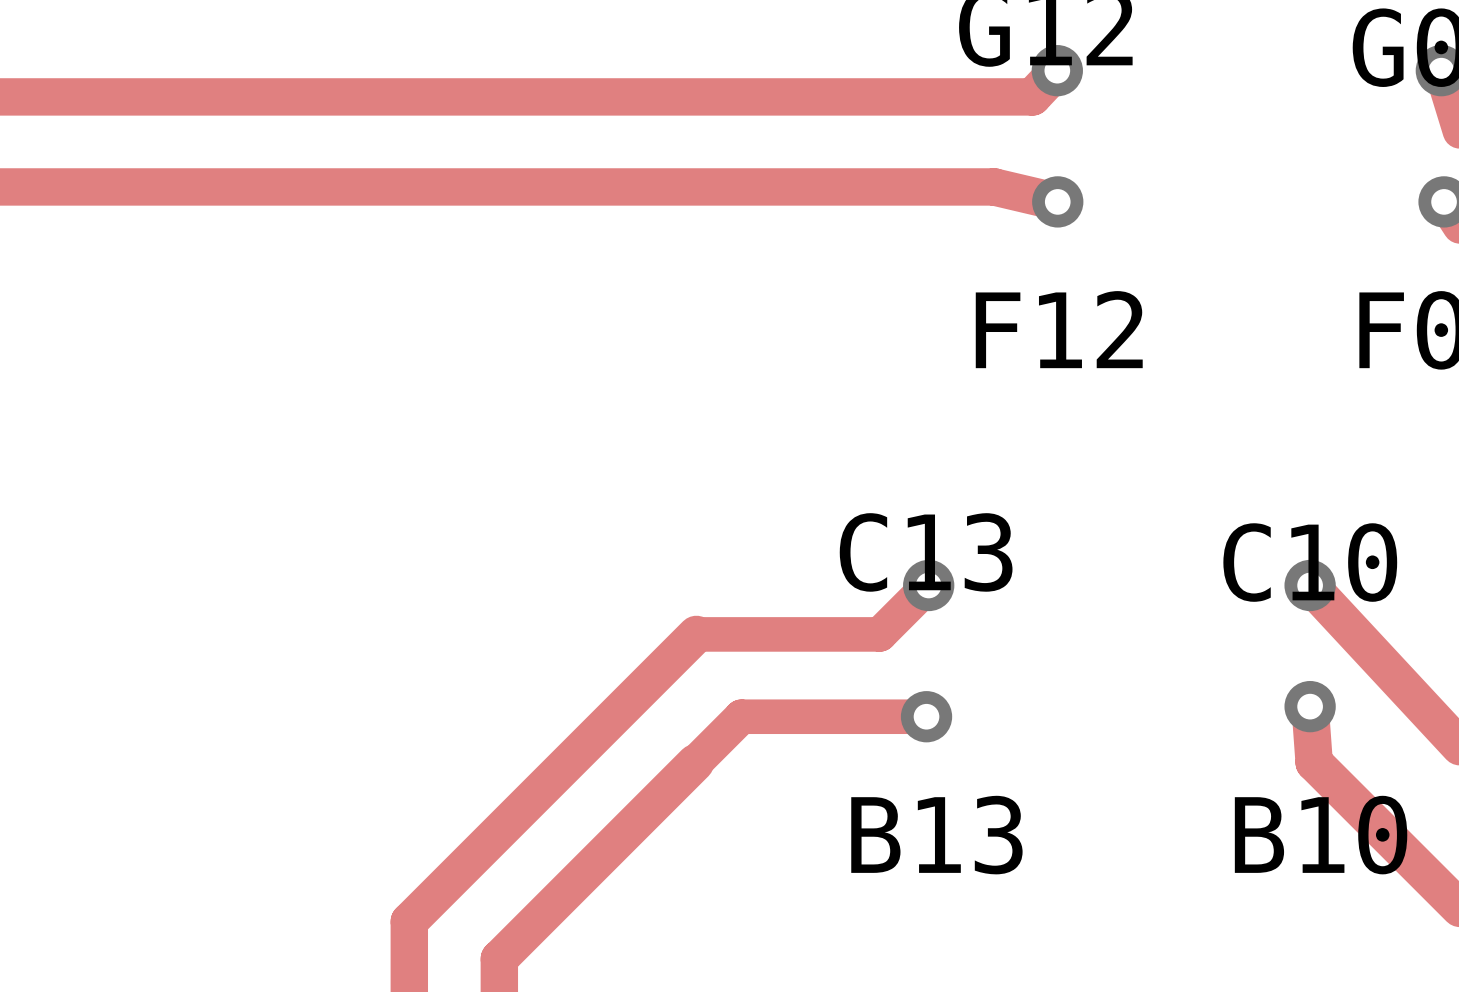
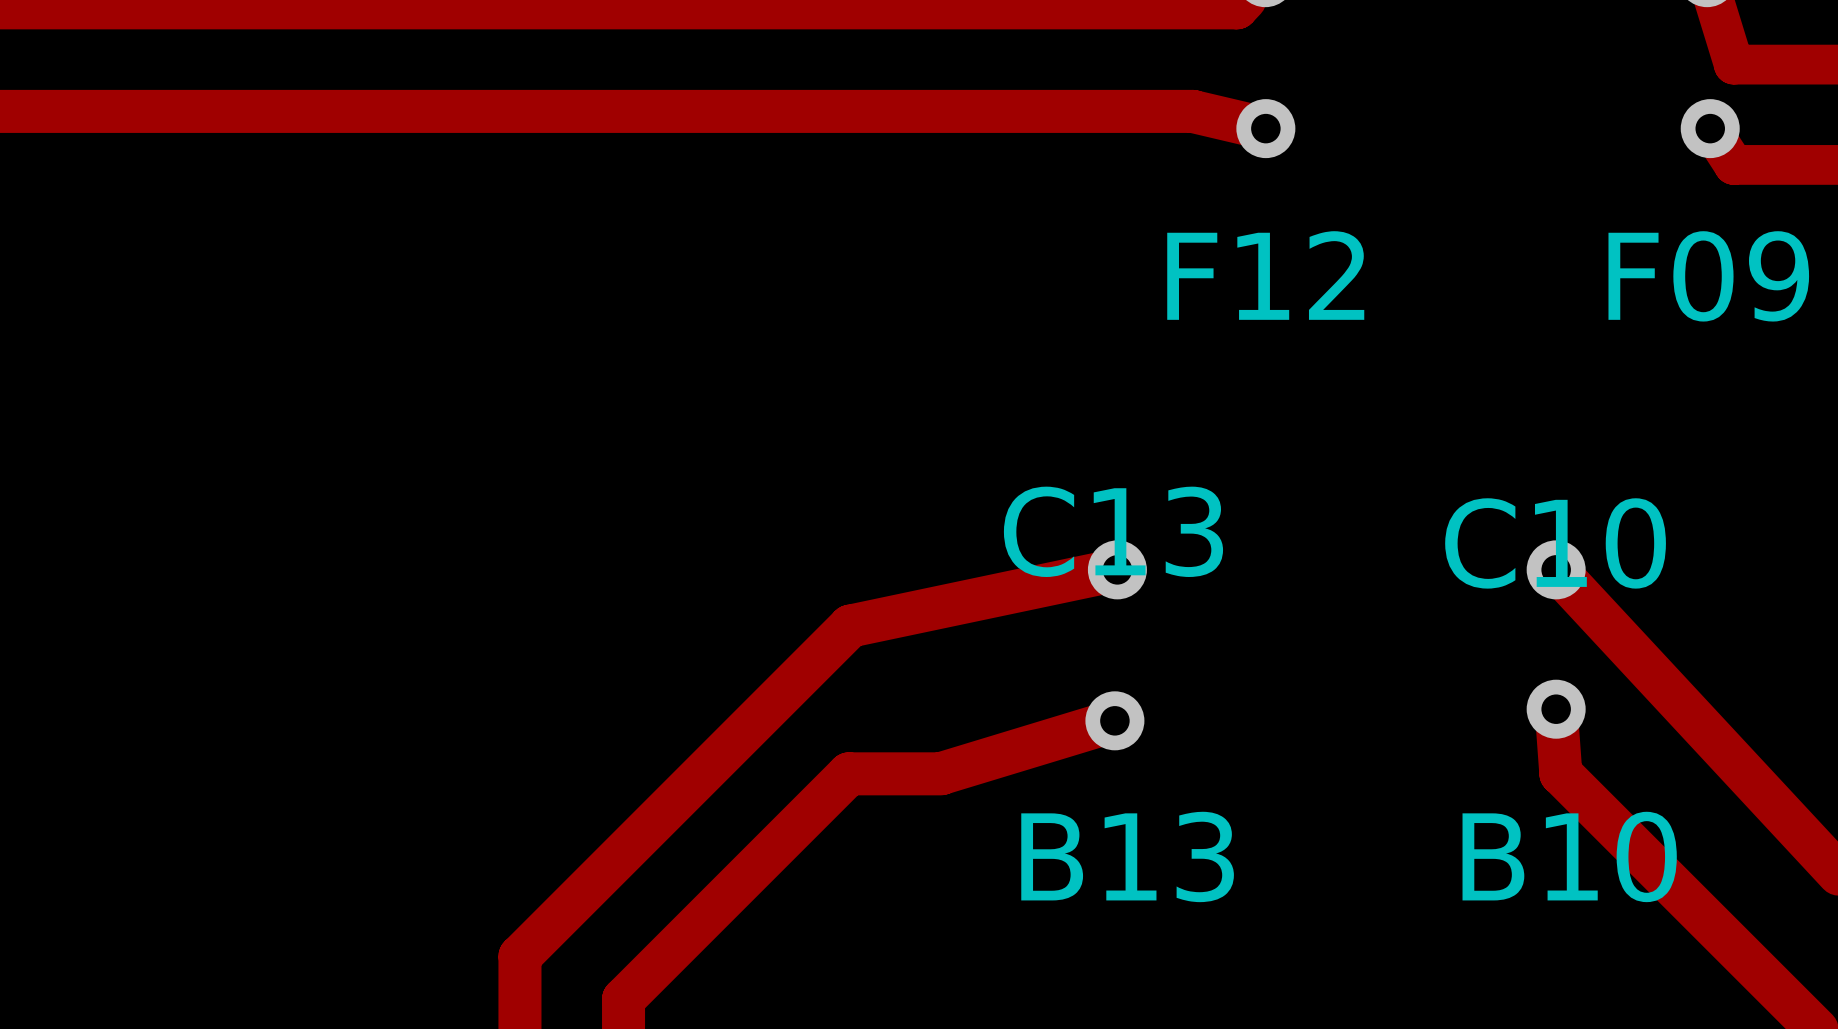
track: (928, 585) (879, 634) (696, 634) (409, 921) -> (1117, 569) (850, 626) (519, 956)
track: (926, 716) (741, 716) (695, 762) -> (1114, 720) (941, 773)
track: none -> (849, 773) (940, 773)

